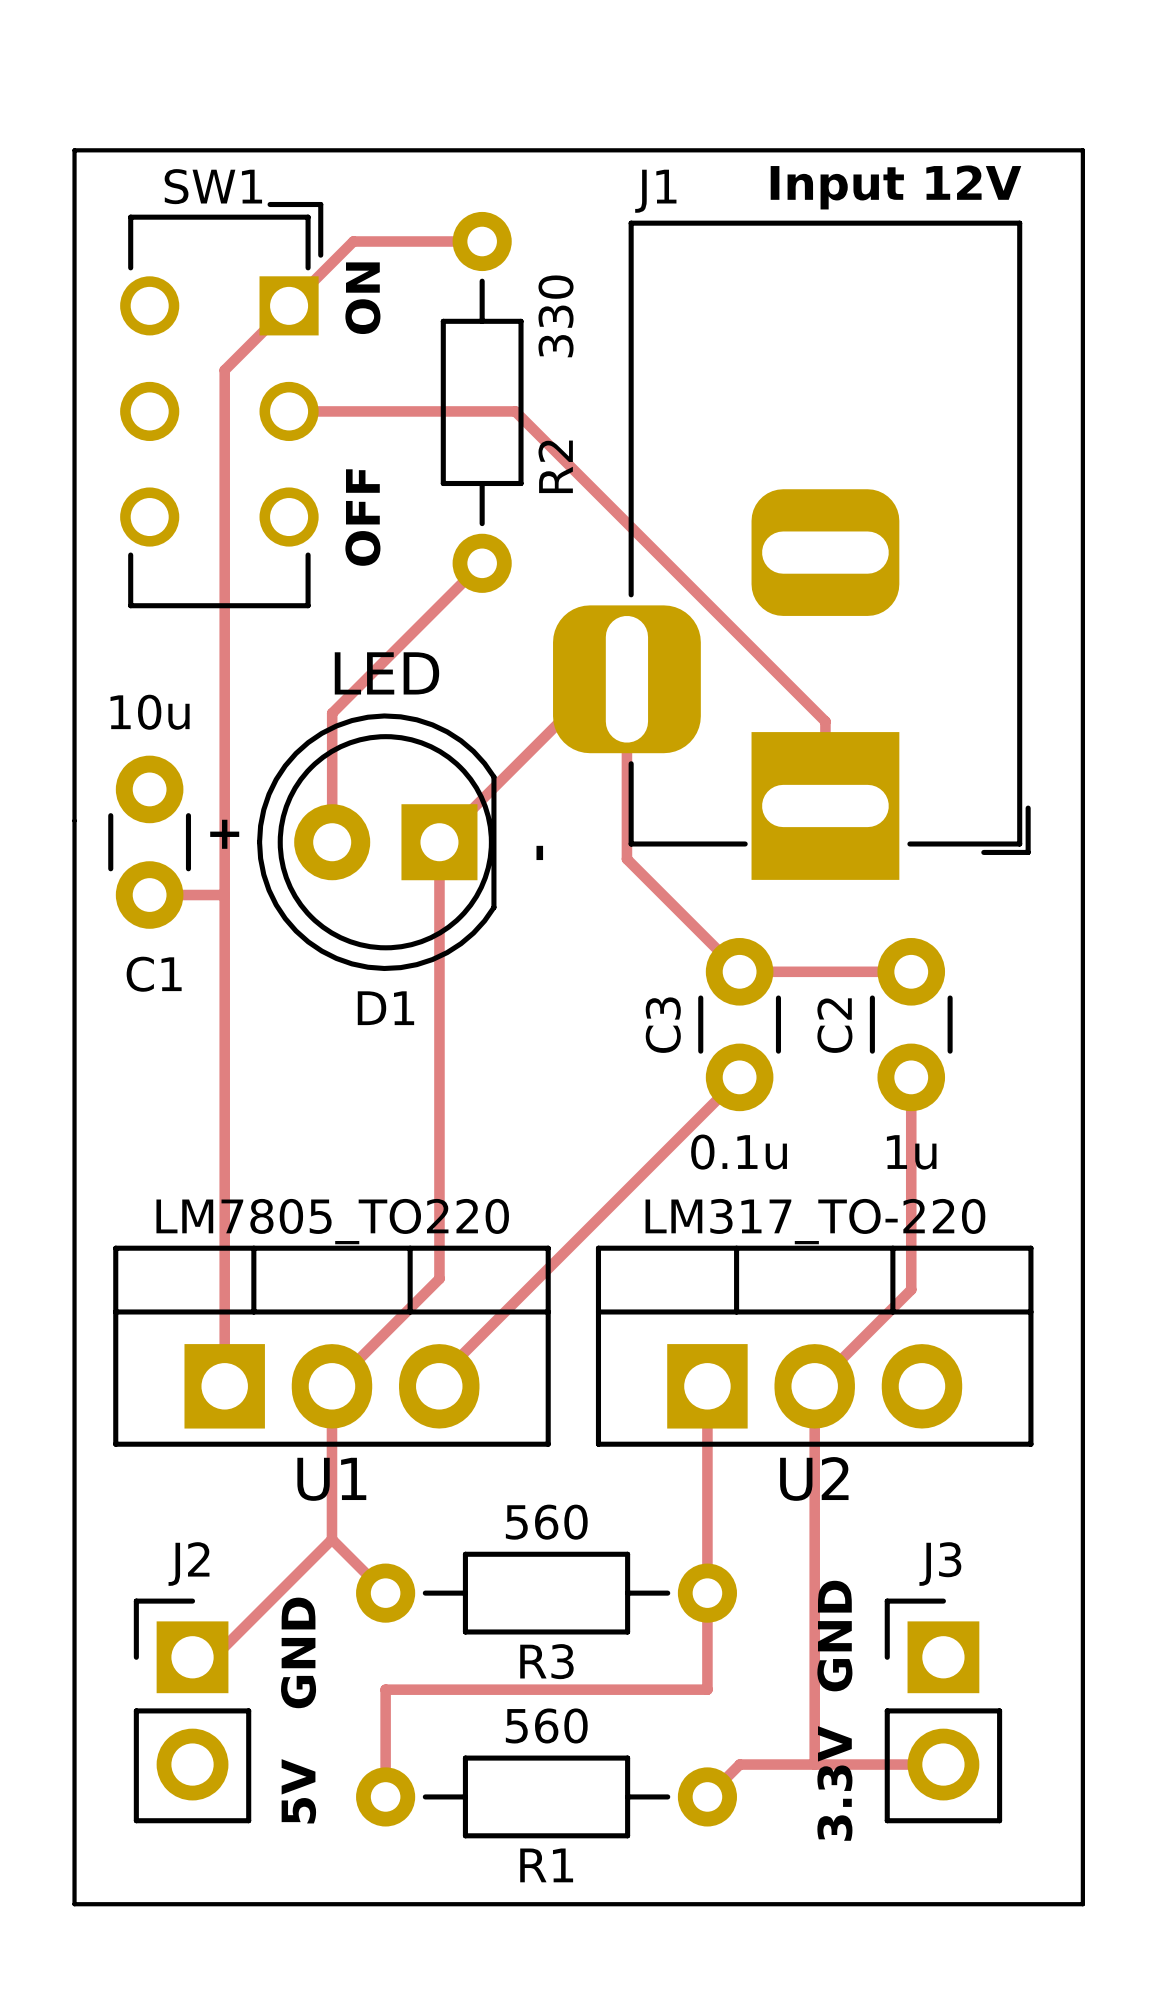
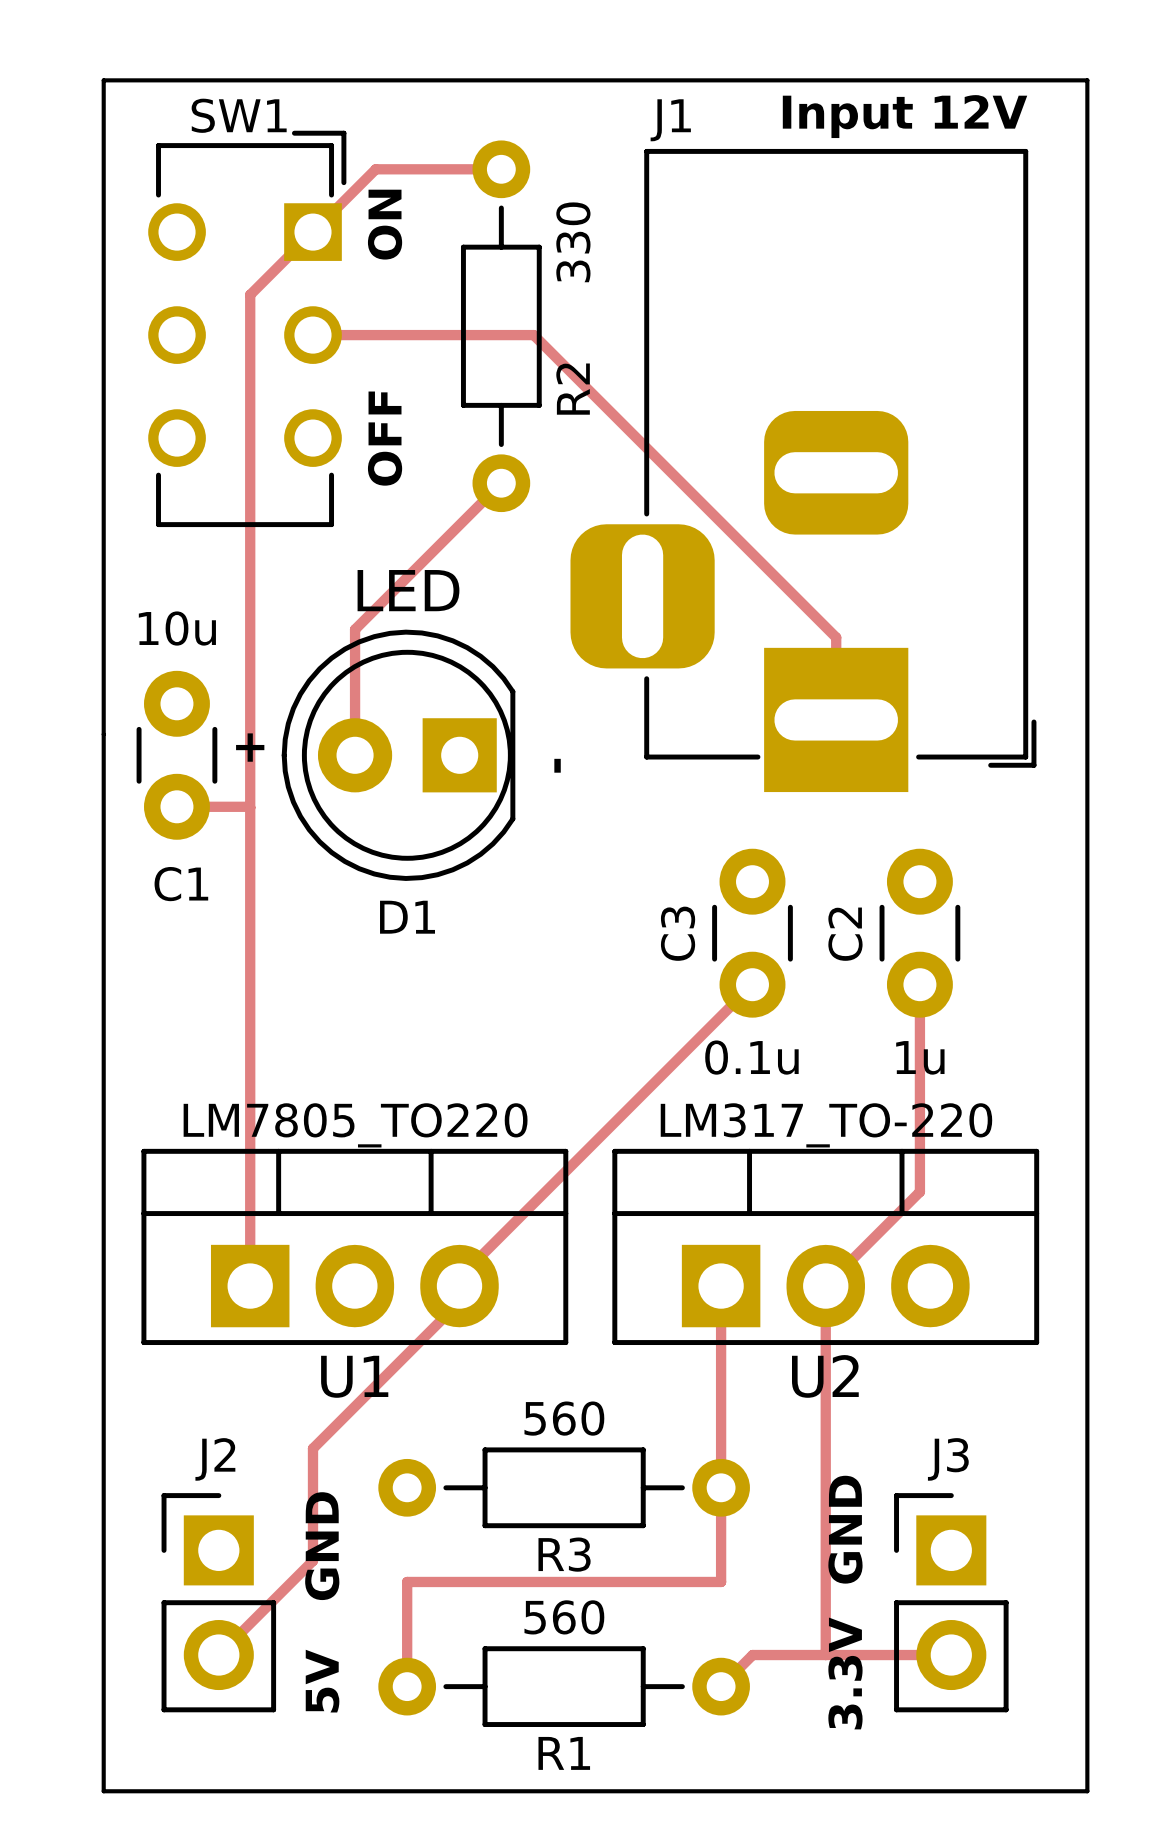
track: (602, 679) (439, 842) (439, 1278) (331, 1386) (331, 1539) -> none
track: (626, 679) (626, 859) (739, 971) (911, 971) -> none
track: none -> (459, 1286) (459, 1302) (313, 1448) (313, 1560) (218, 1655)
track: (331, 1539) (385, 1593) -> none
track: (331, 1539) (214, 1657) -> none

